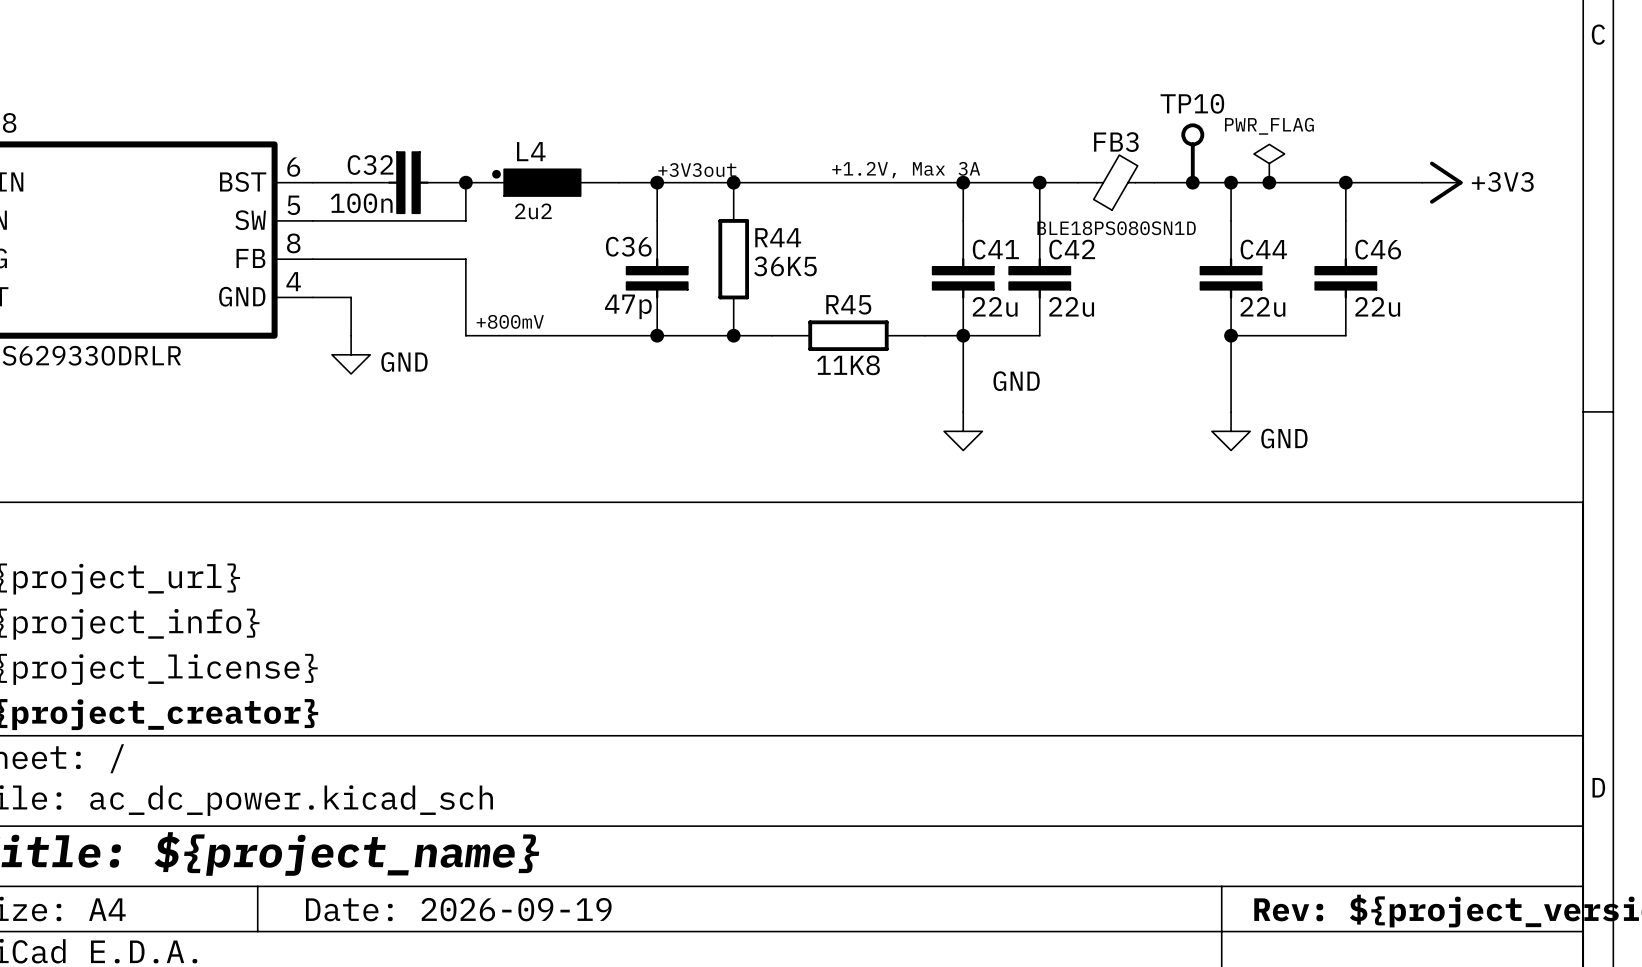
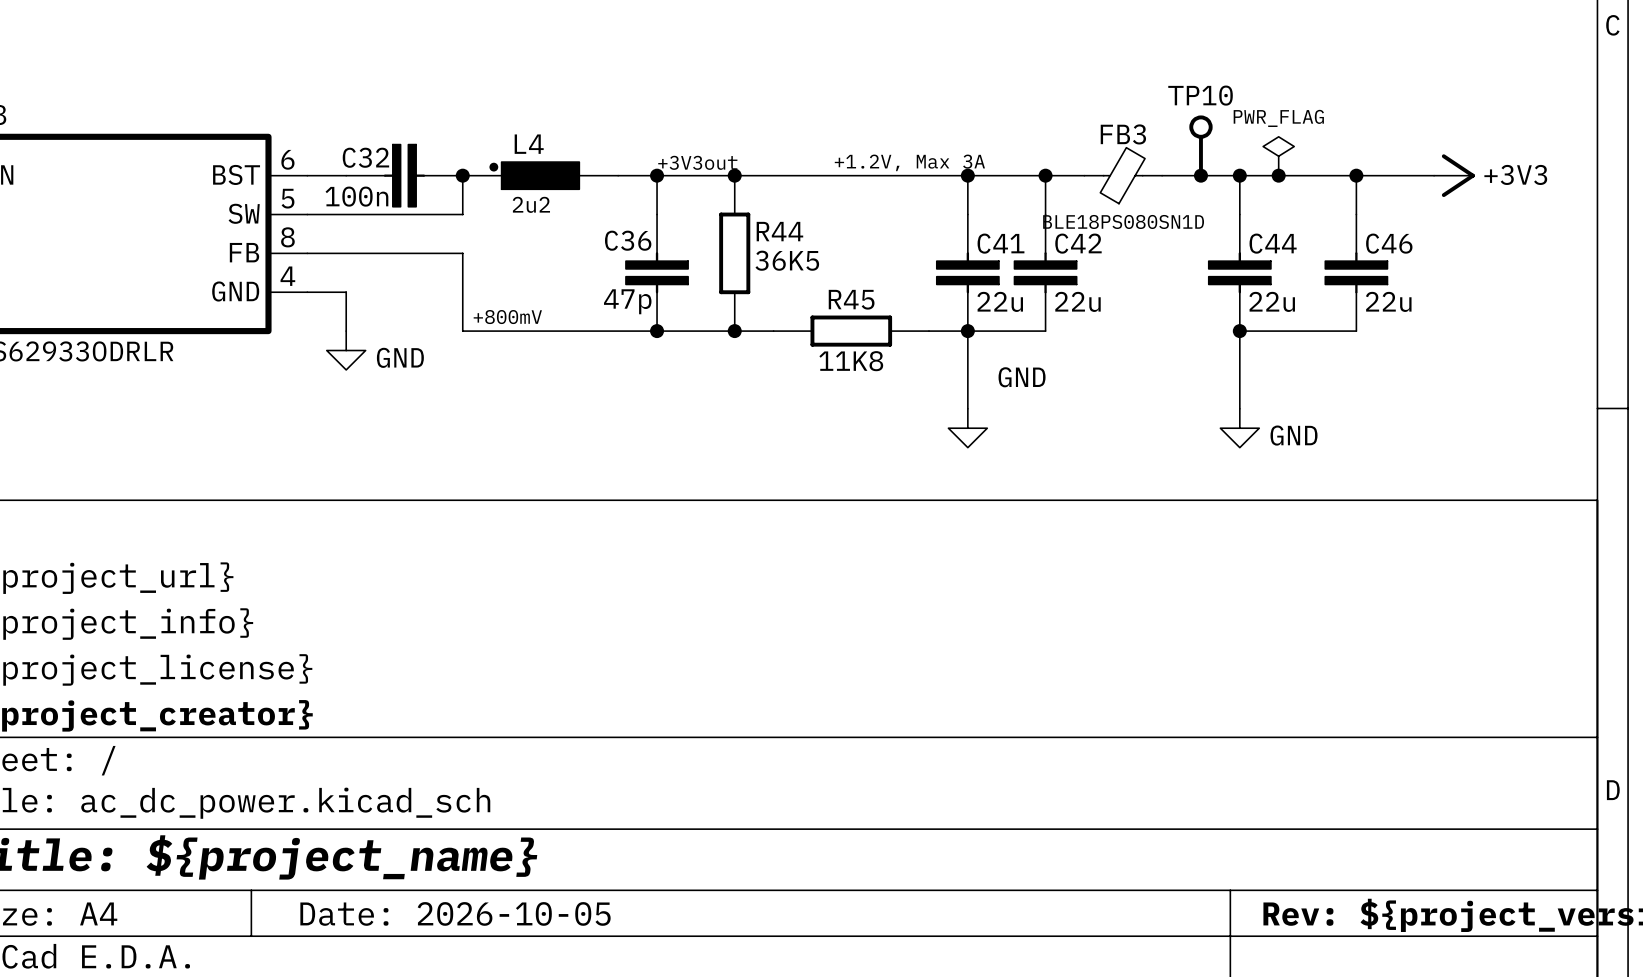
title block: Date: 2026-09-19 (458, 909) -> Date: 2026-10-05 (455, 913)

